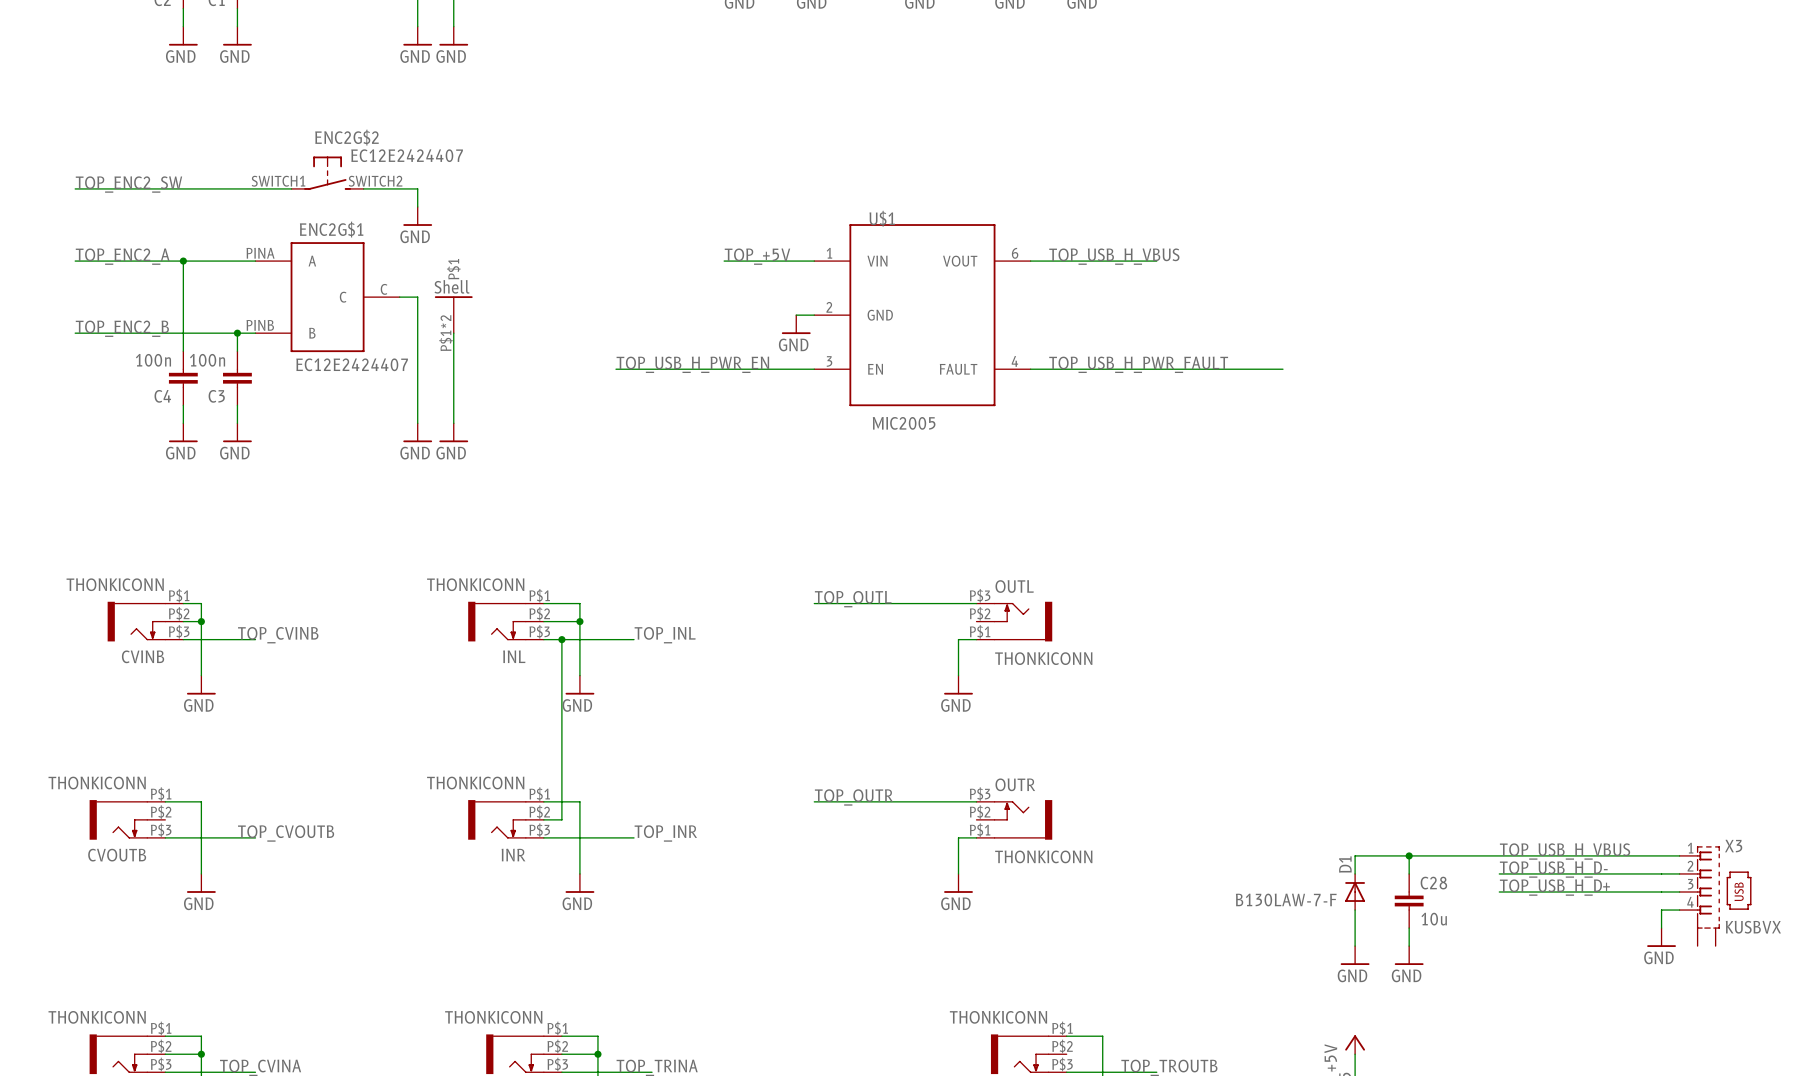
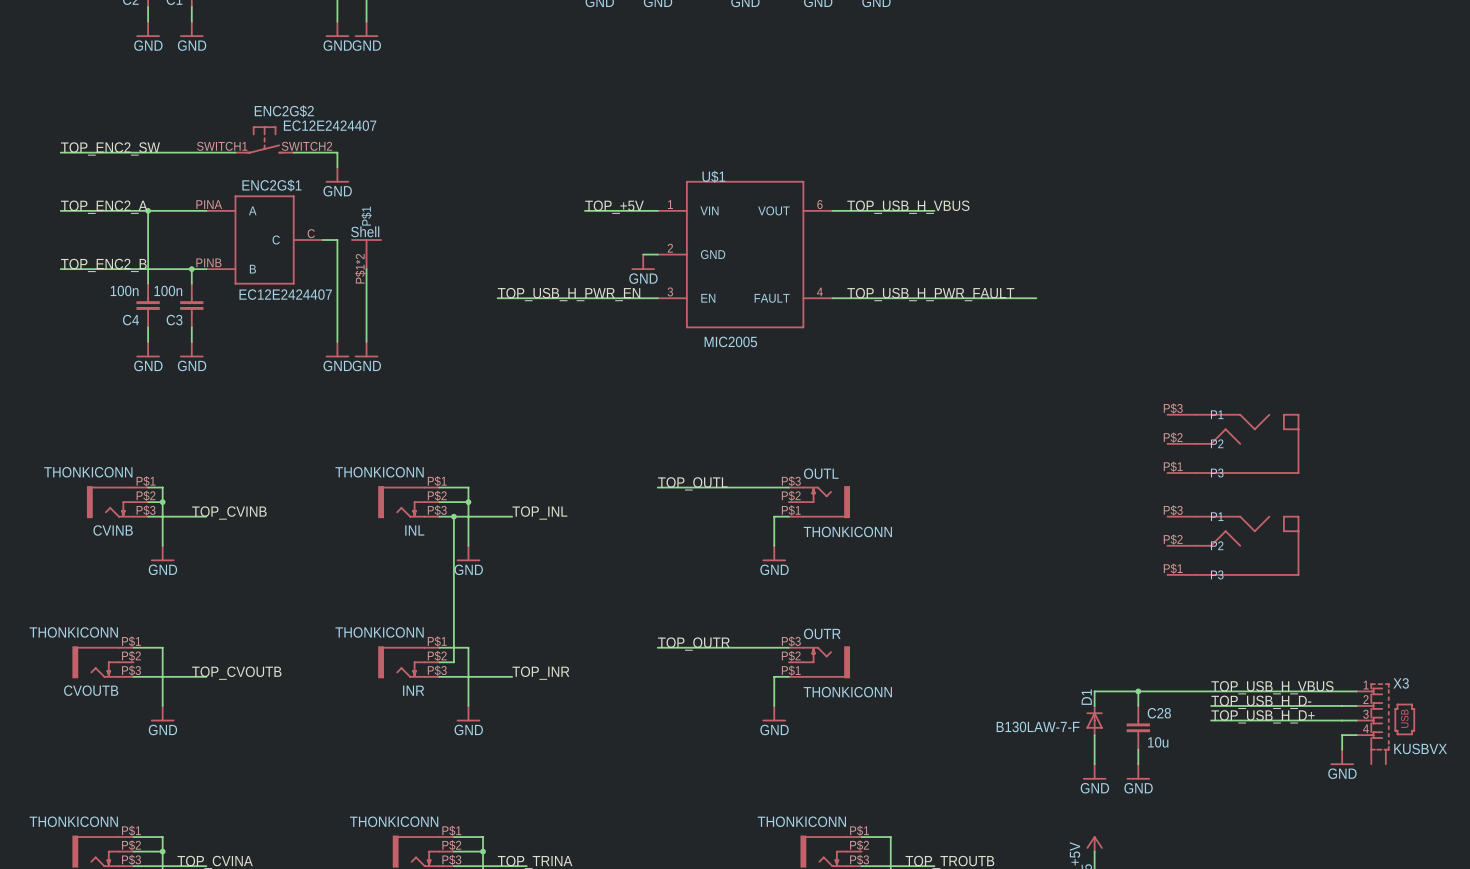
part: none -> (1233, 443)
part: none -> (1233, 545)

